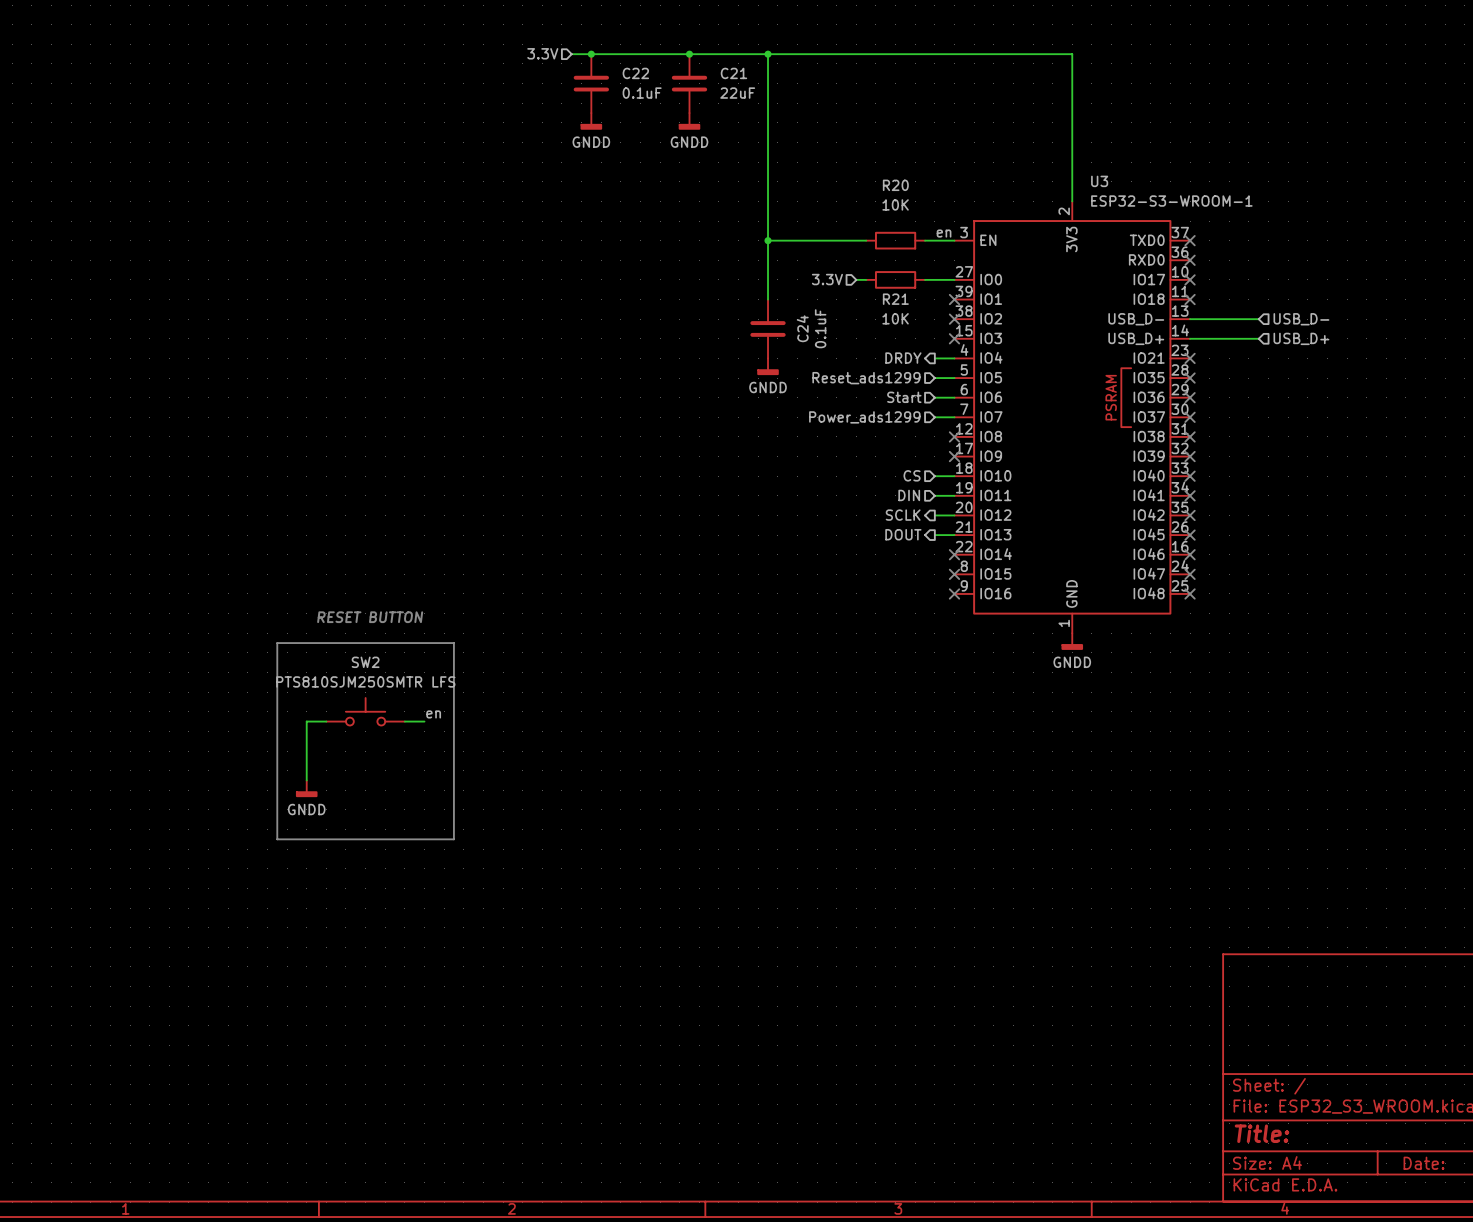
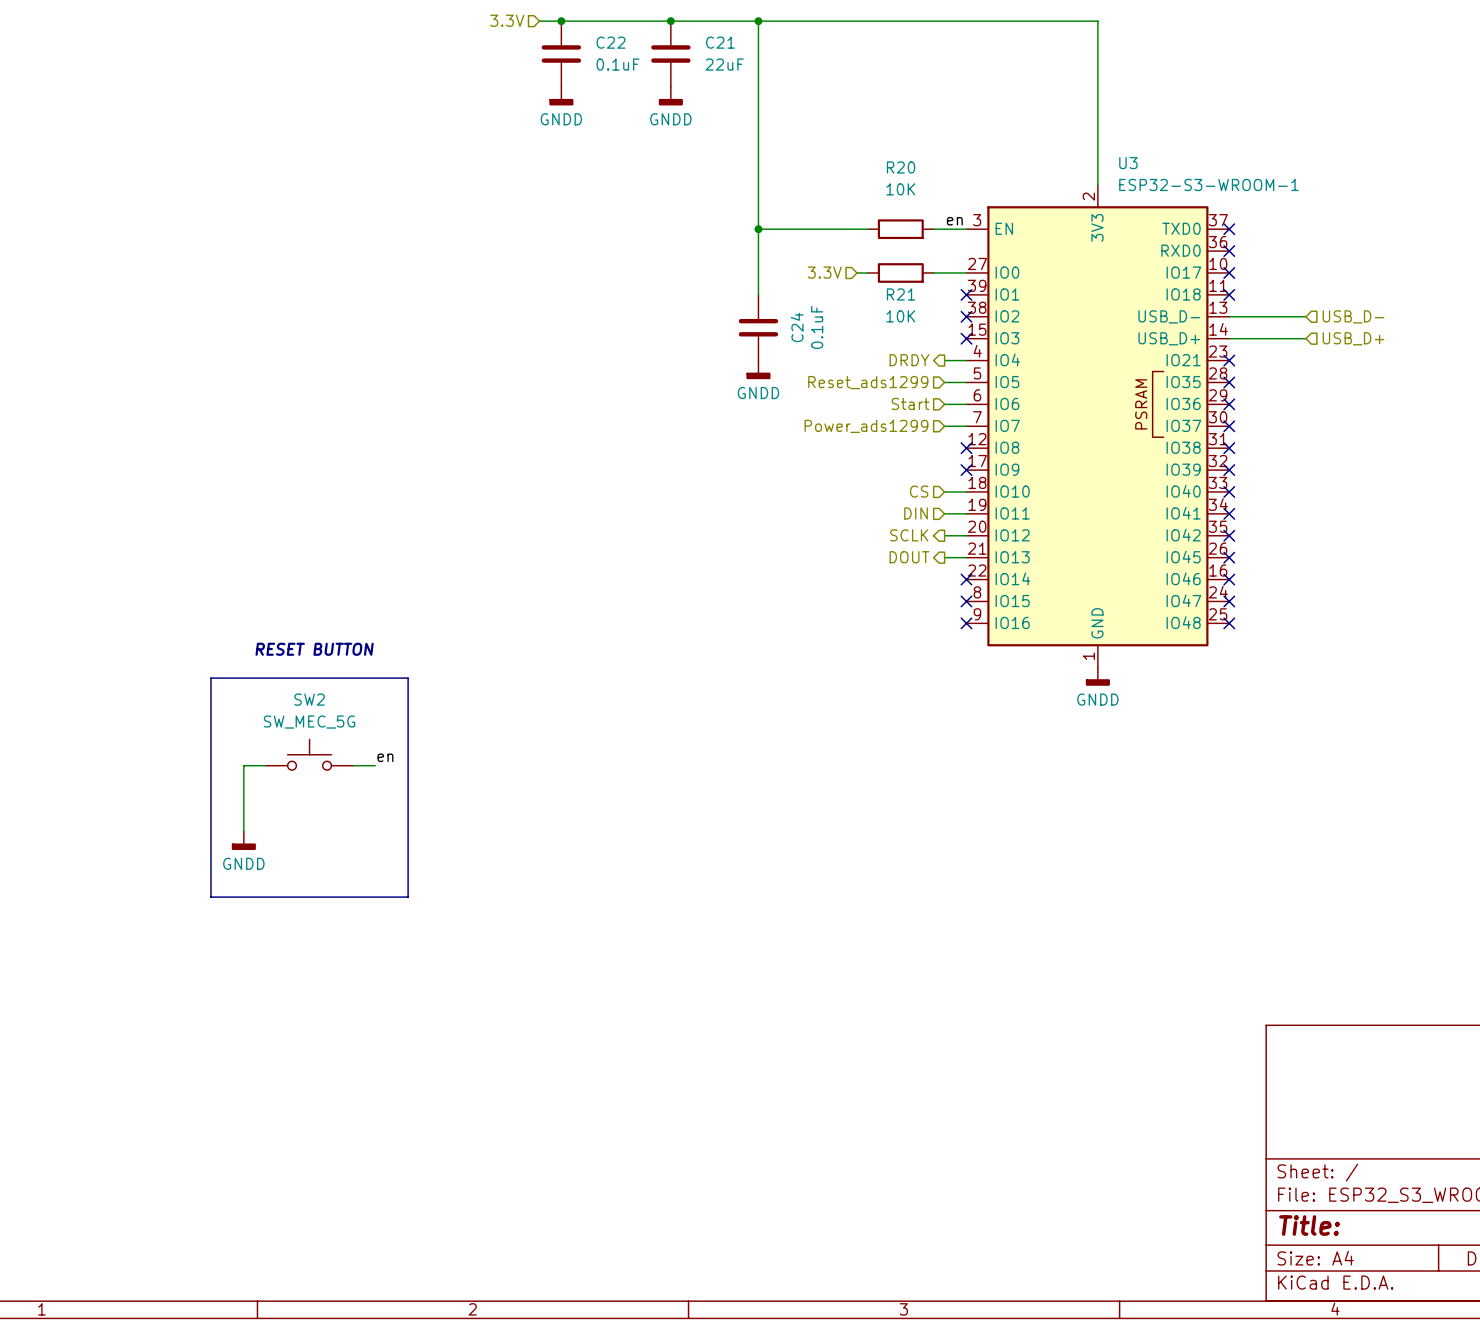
SW2 value: PTS810SJM250SMTR LFS (365, 681) -> SW_MEC_5G (309, 722)

